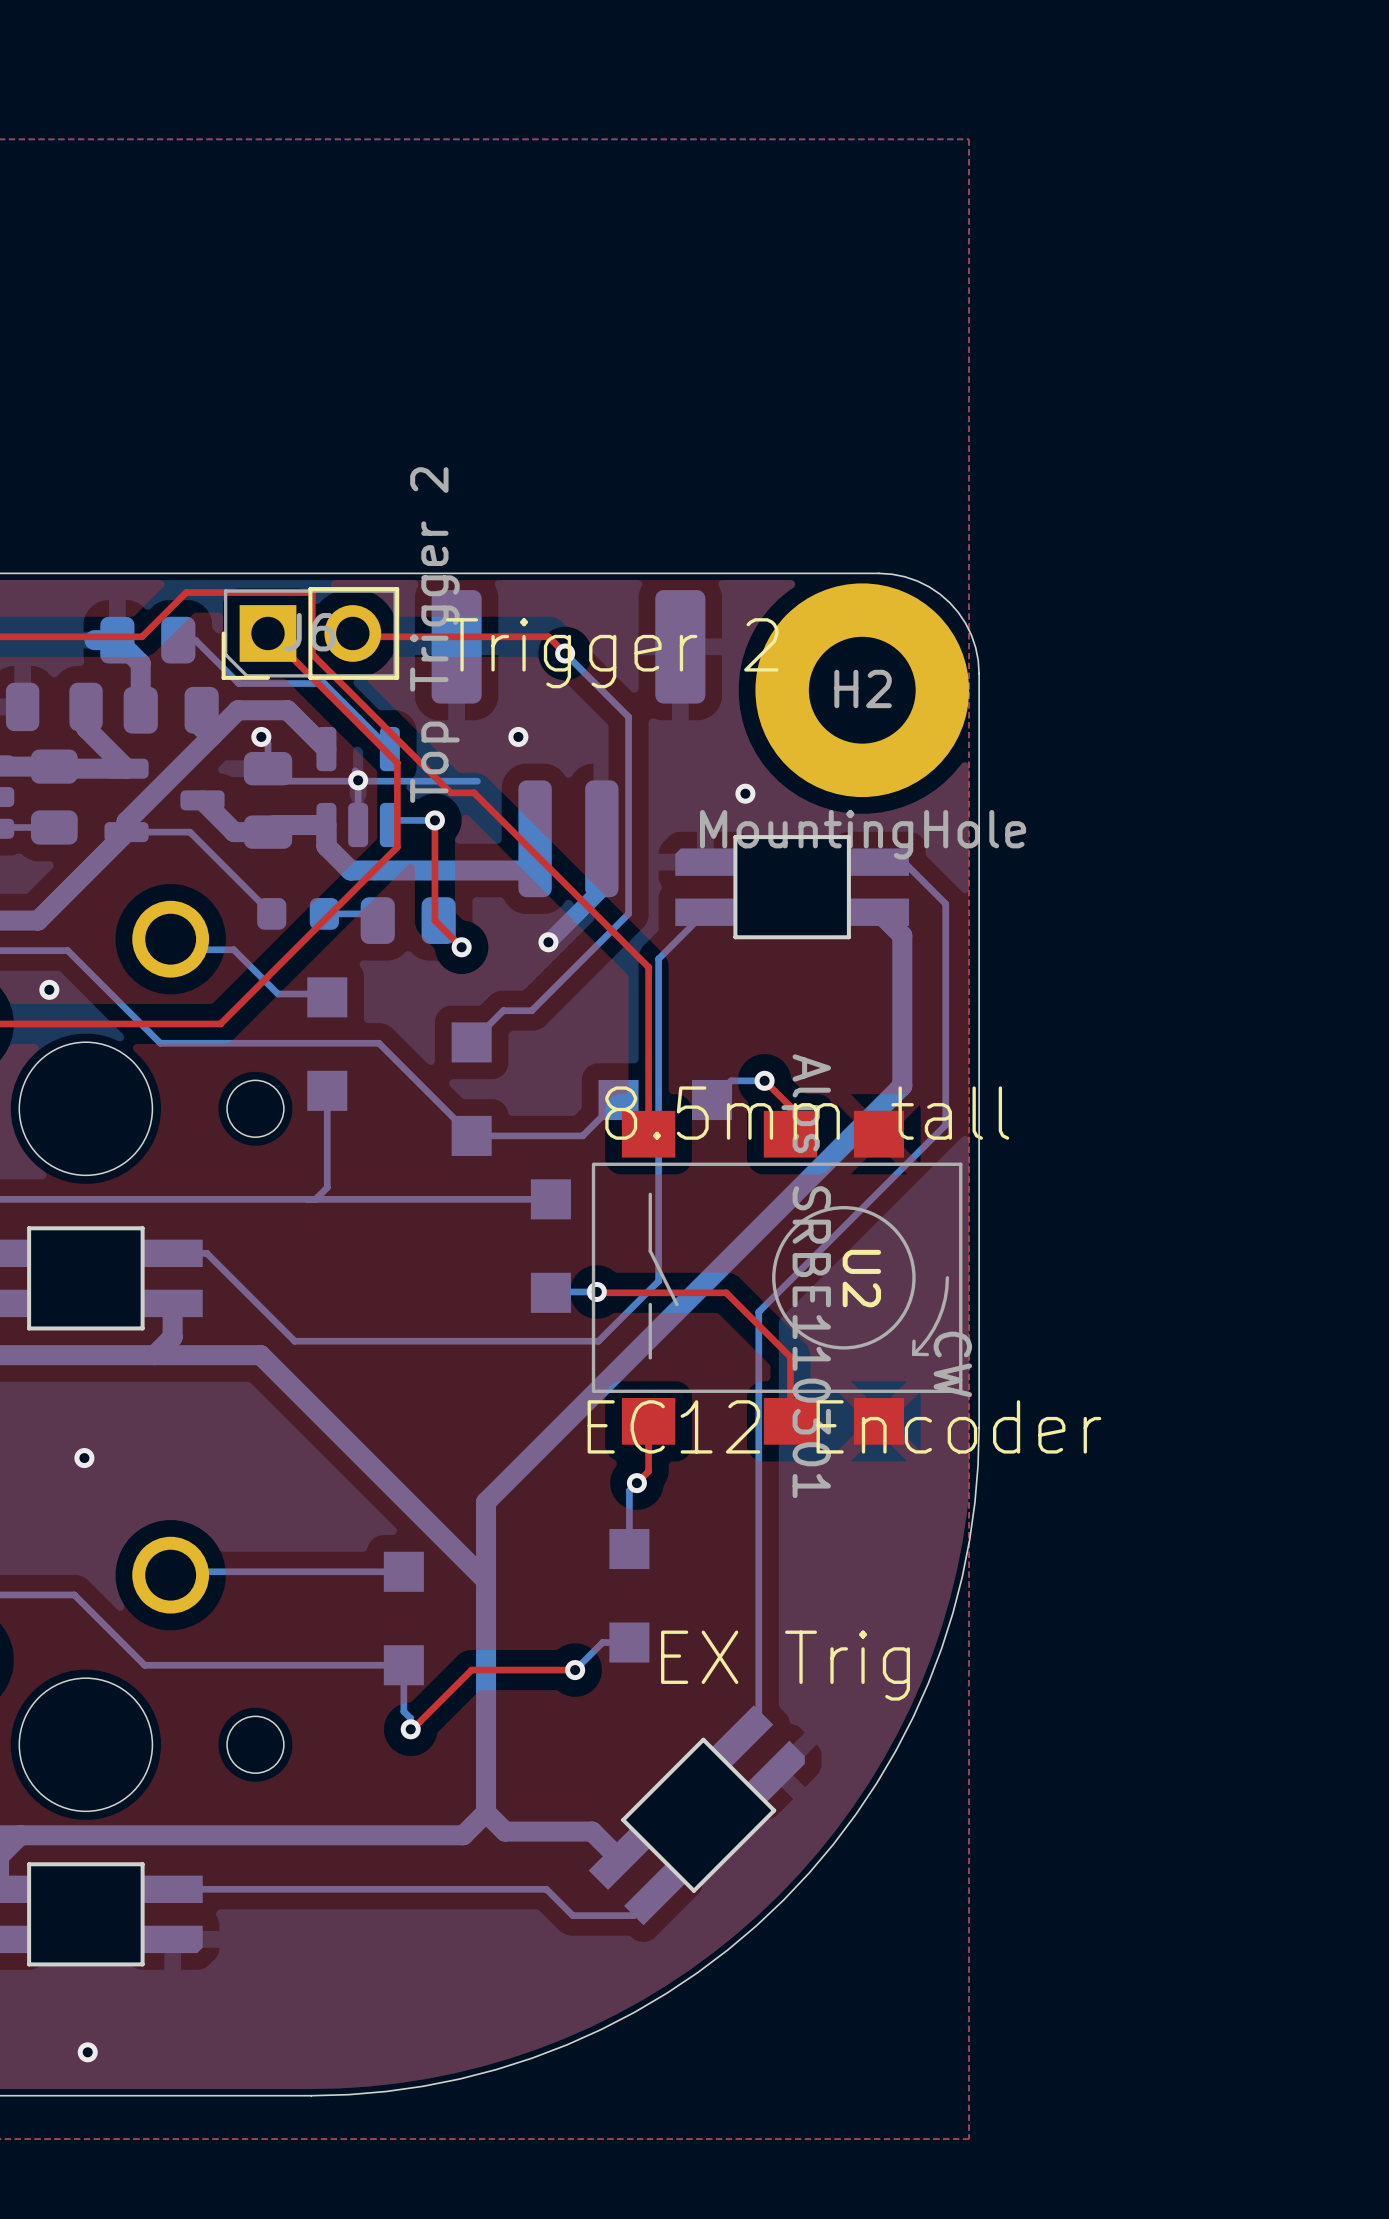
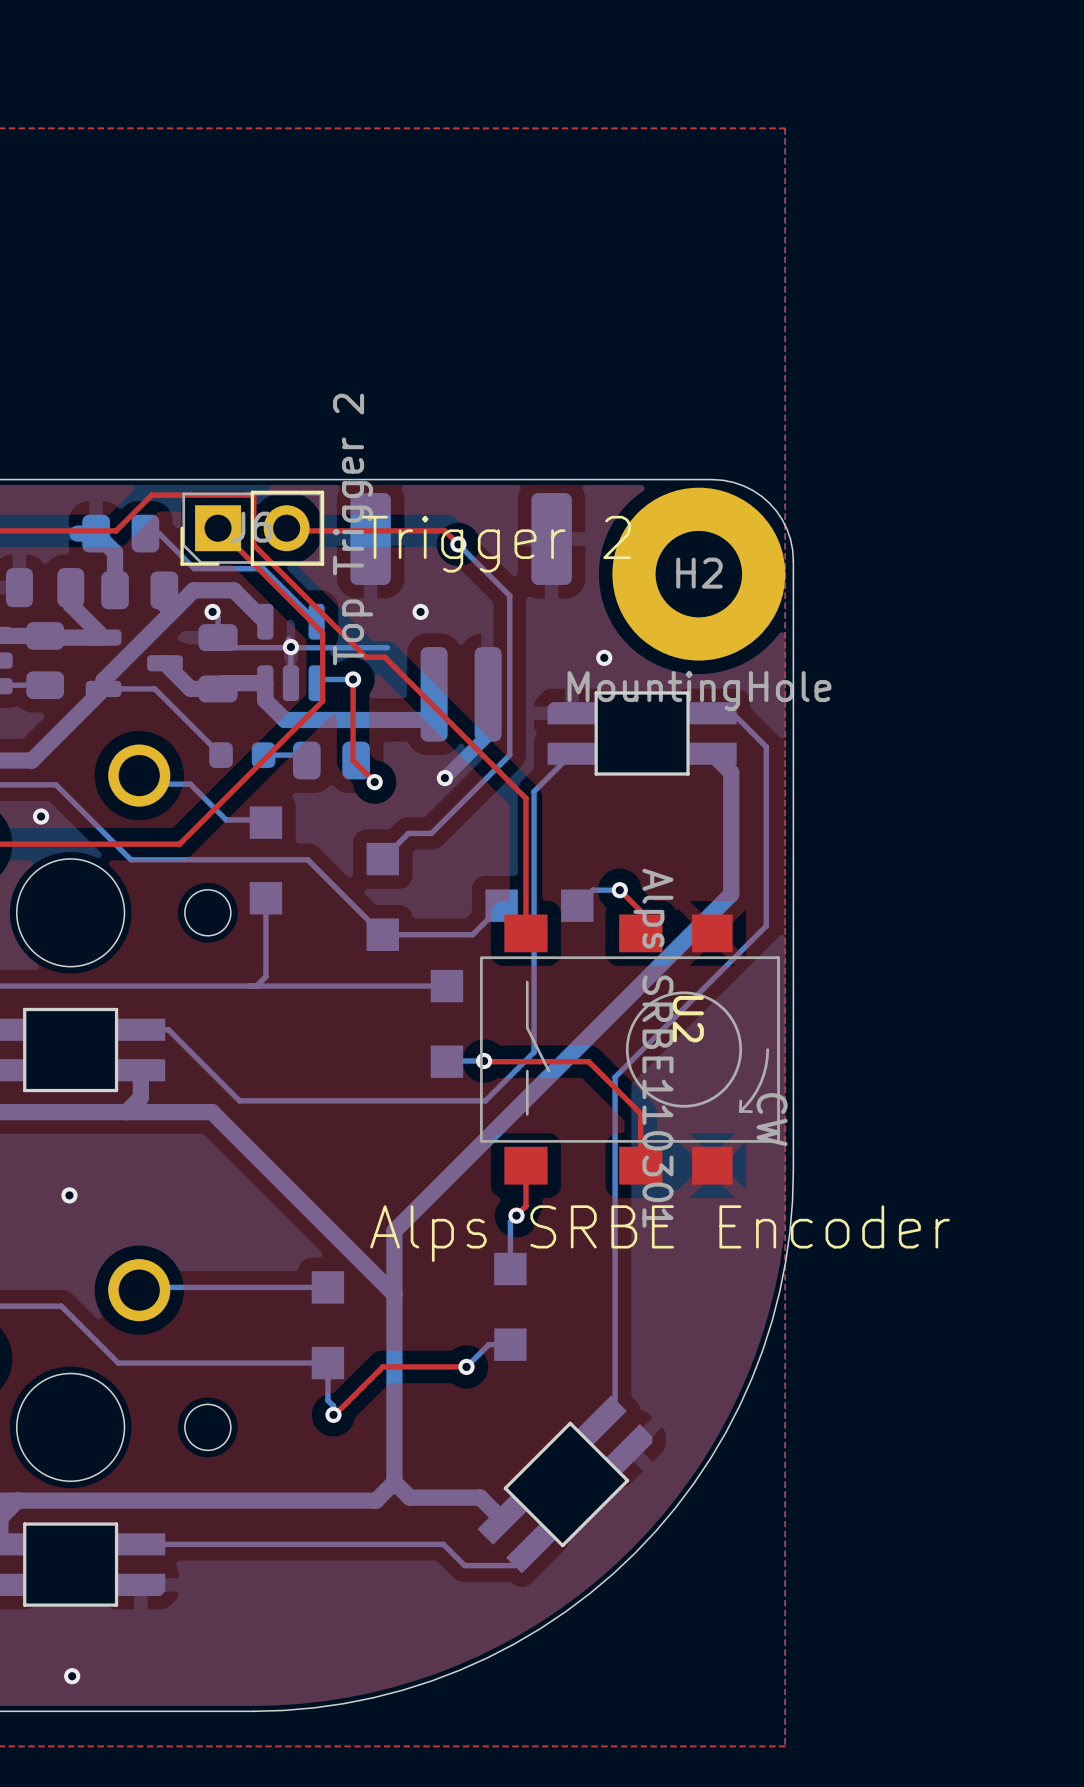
text: 8.5mm tall (807, 1113) -> none
U2 name position: U2 (861, 1278) -> U2 (688, 1019)
text: EC12 Encoder (844, 1426) -> Alps SRBE Encoder (659, 1233)
text: EX Trig (785, 1665) -> none

